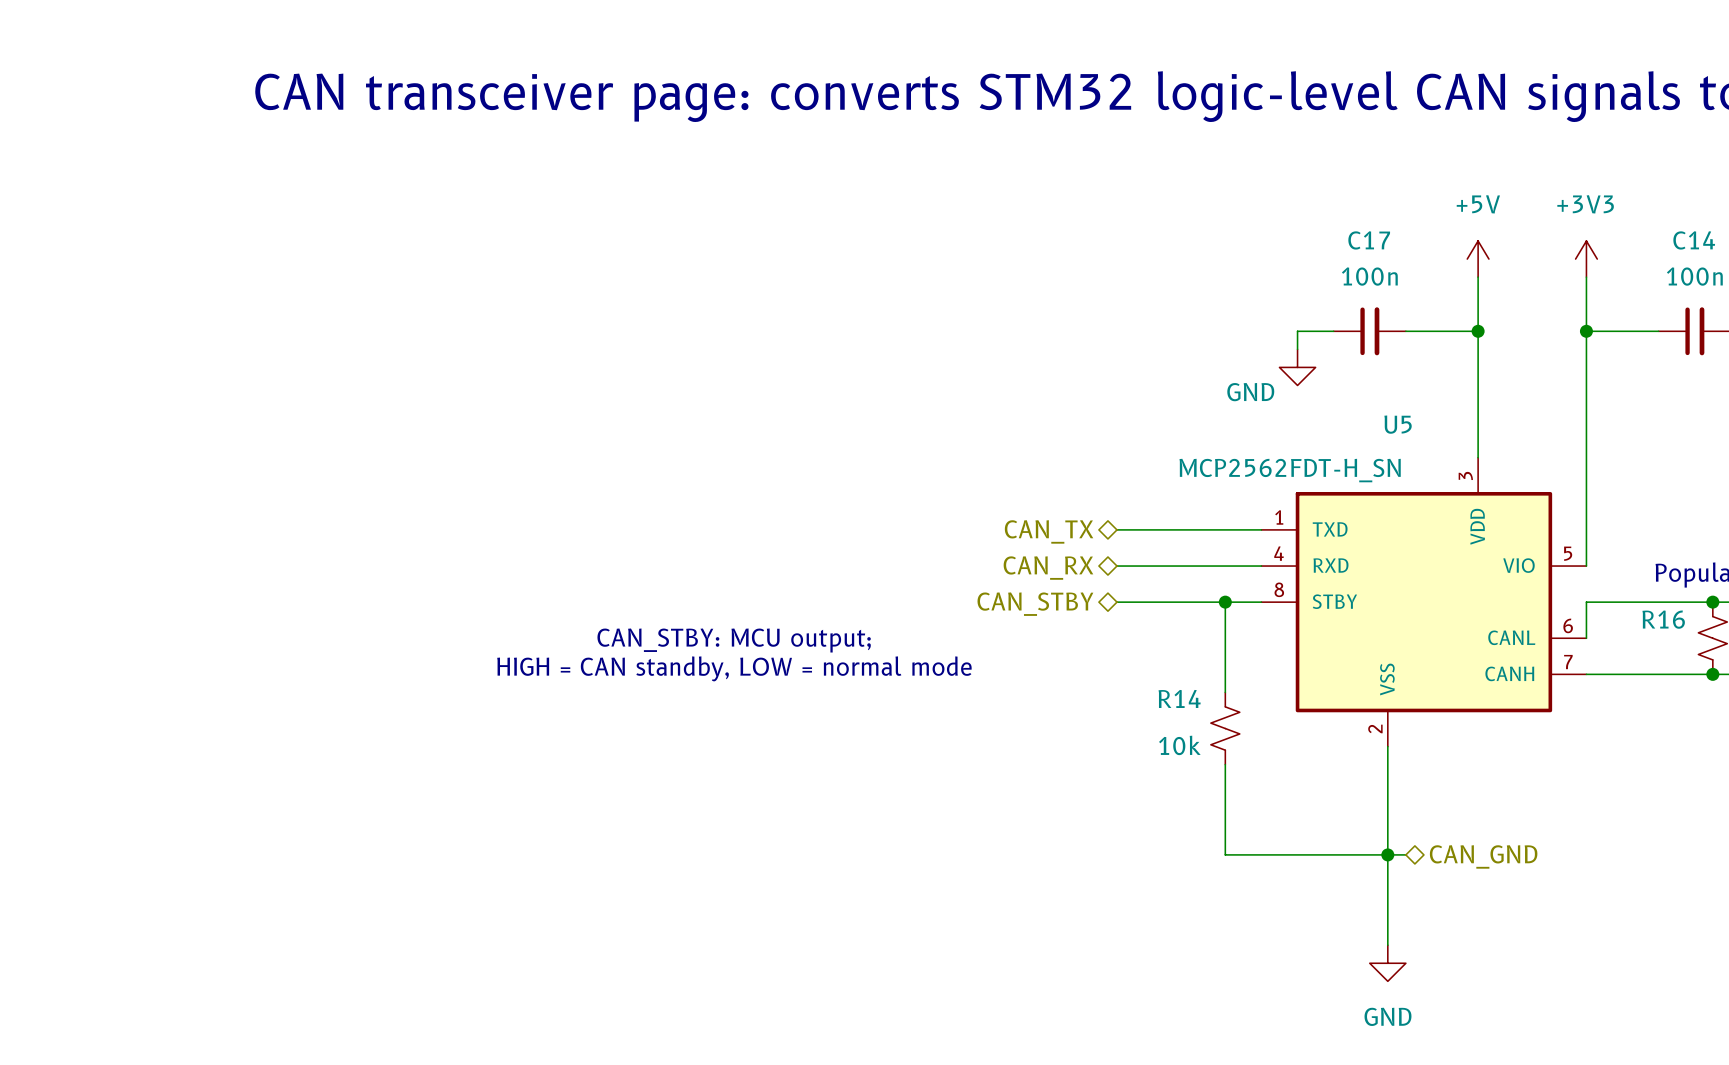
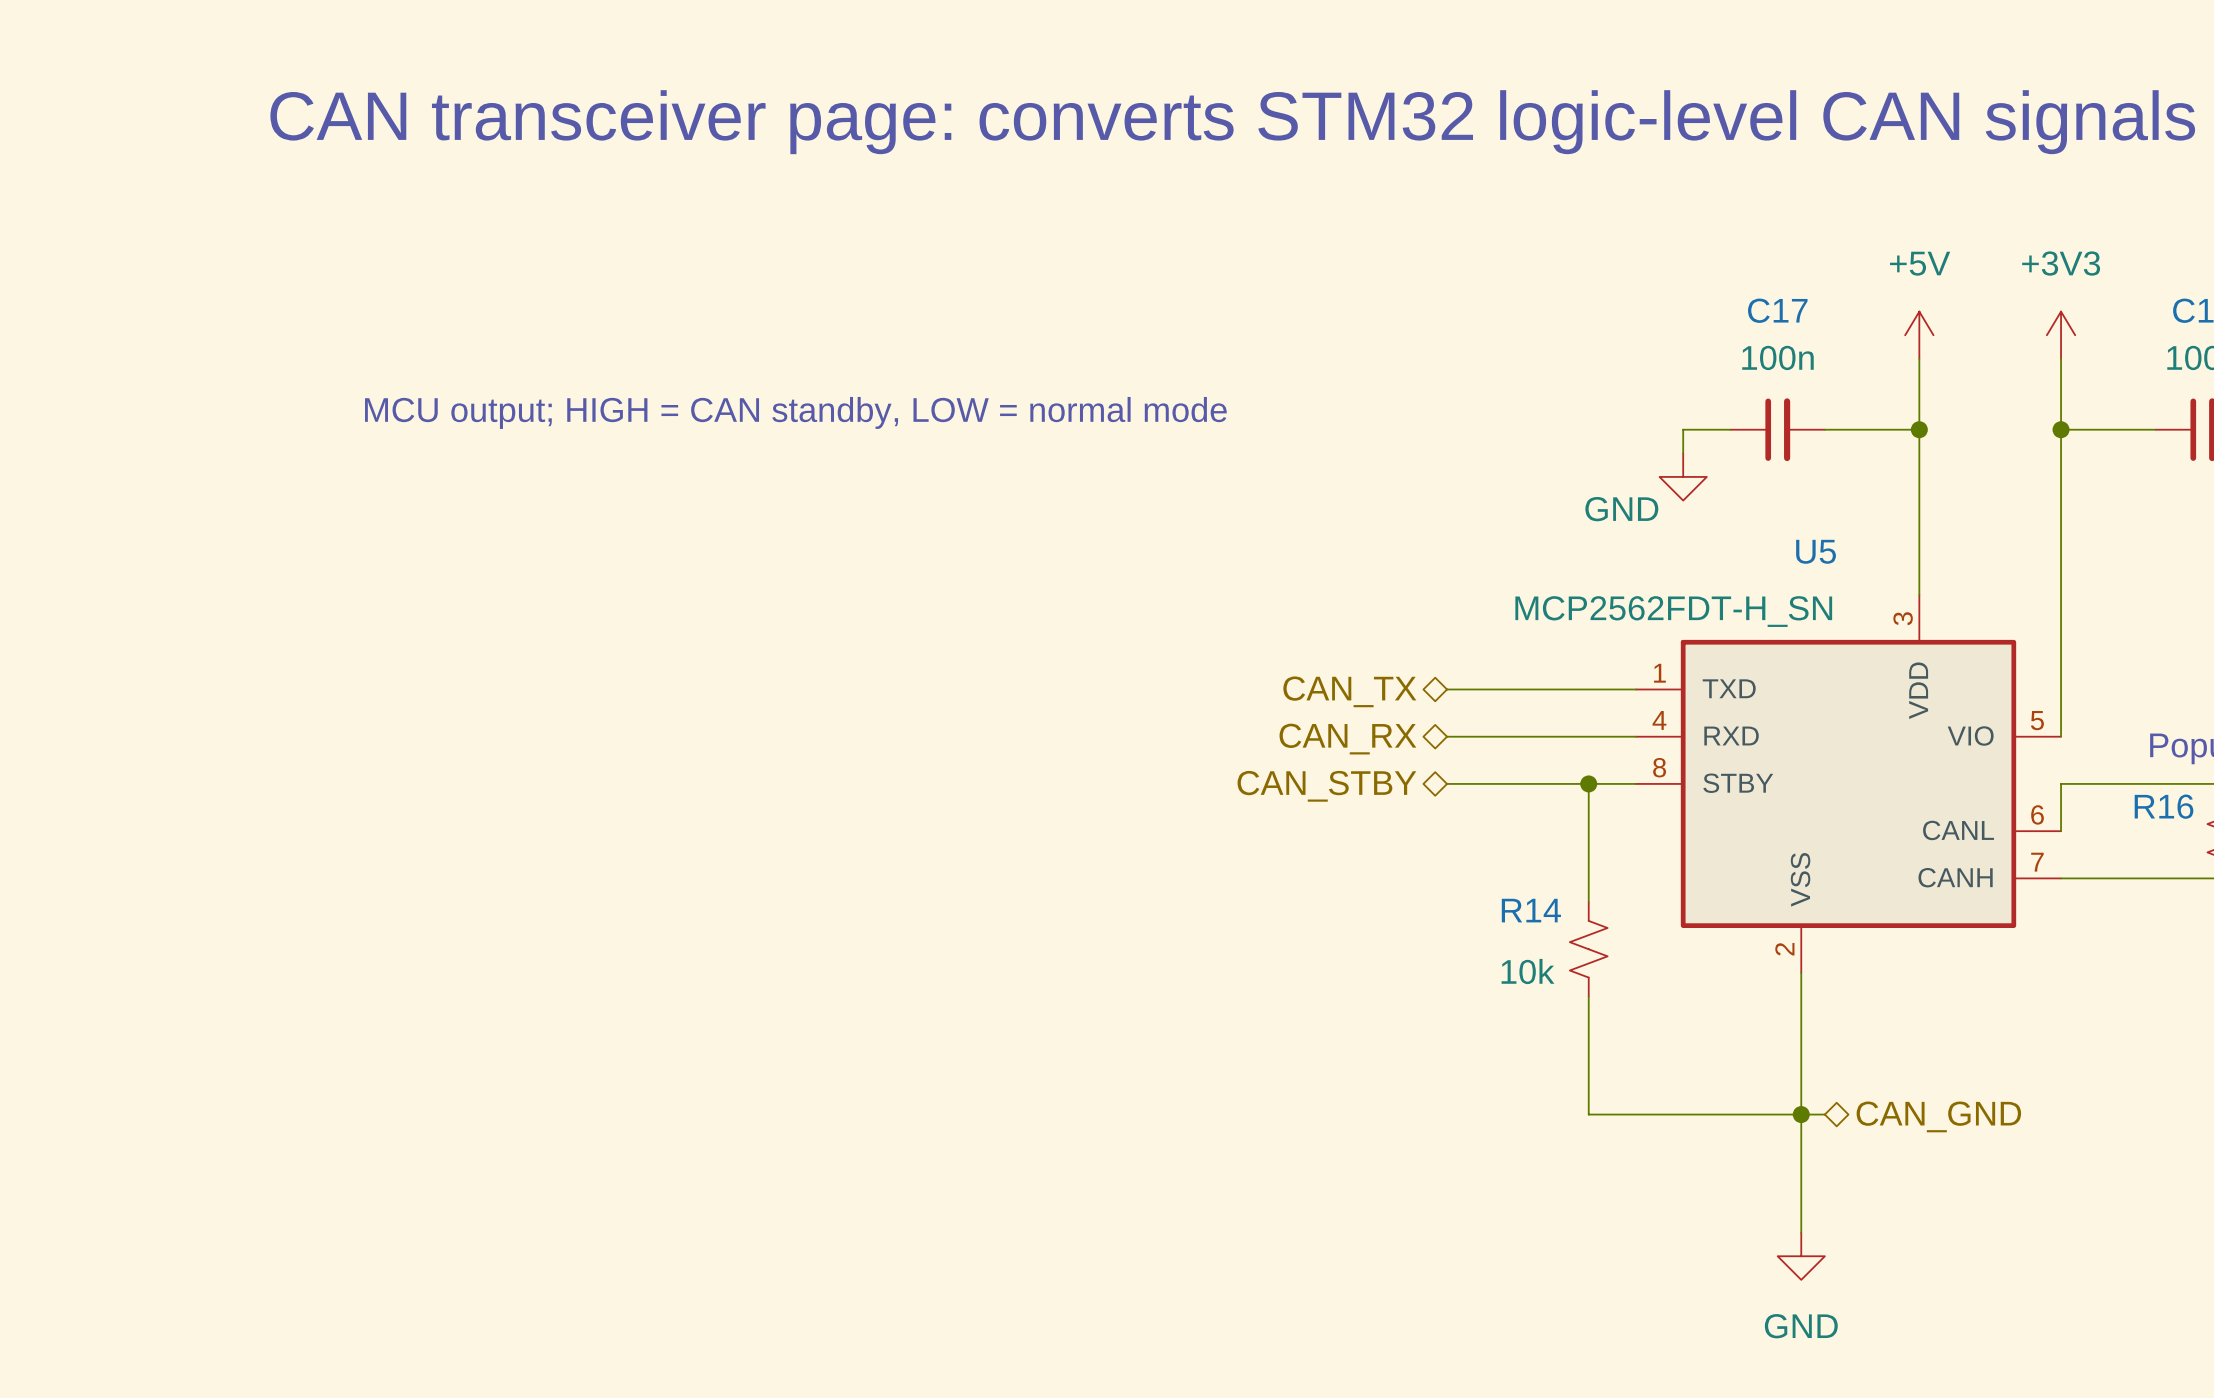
text: none -> MCU output; HIGH = CAN standby, LOW = normal mode (795, 412)
text: CAN_STBY: MCU output; (734, 640) -> none
text: HIGH = CAN standby, LOW = normal mode (734, 668) -> none

